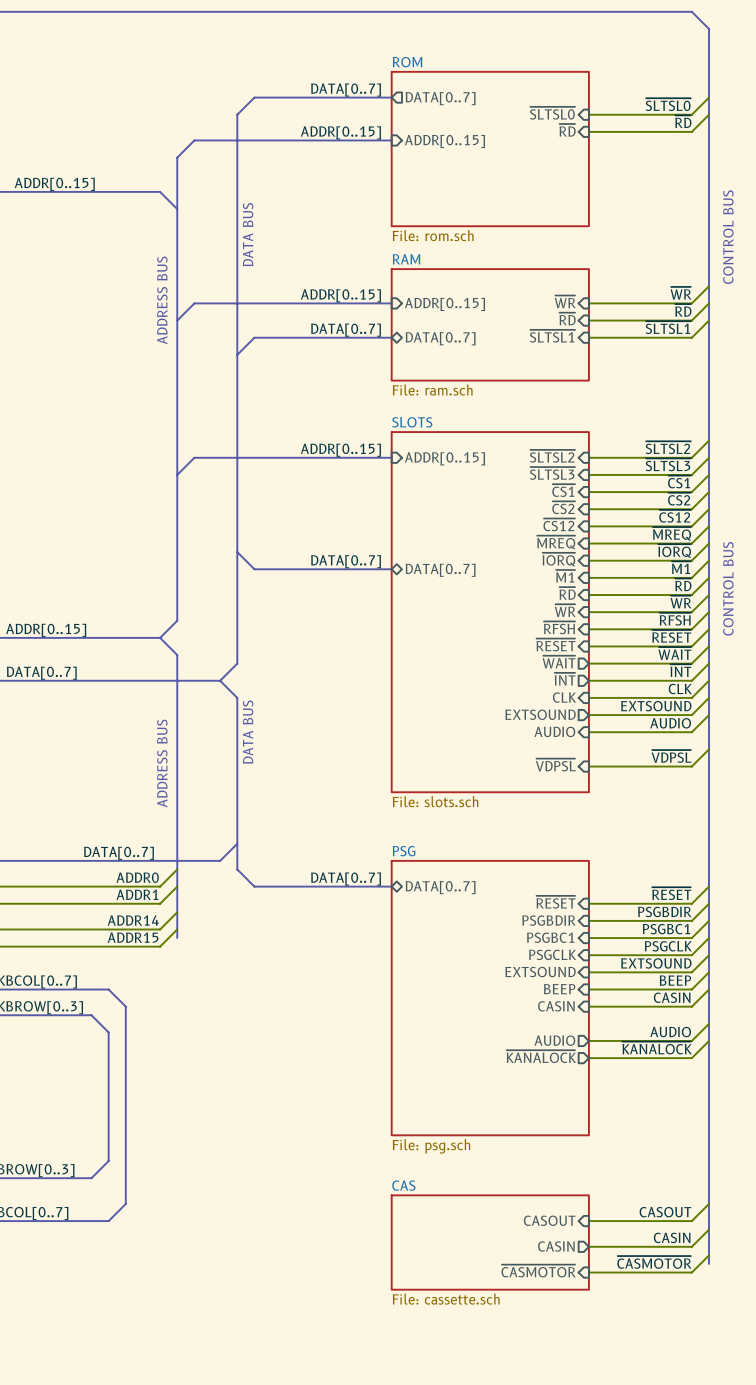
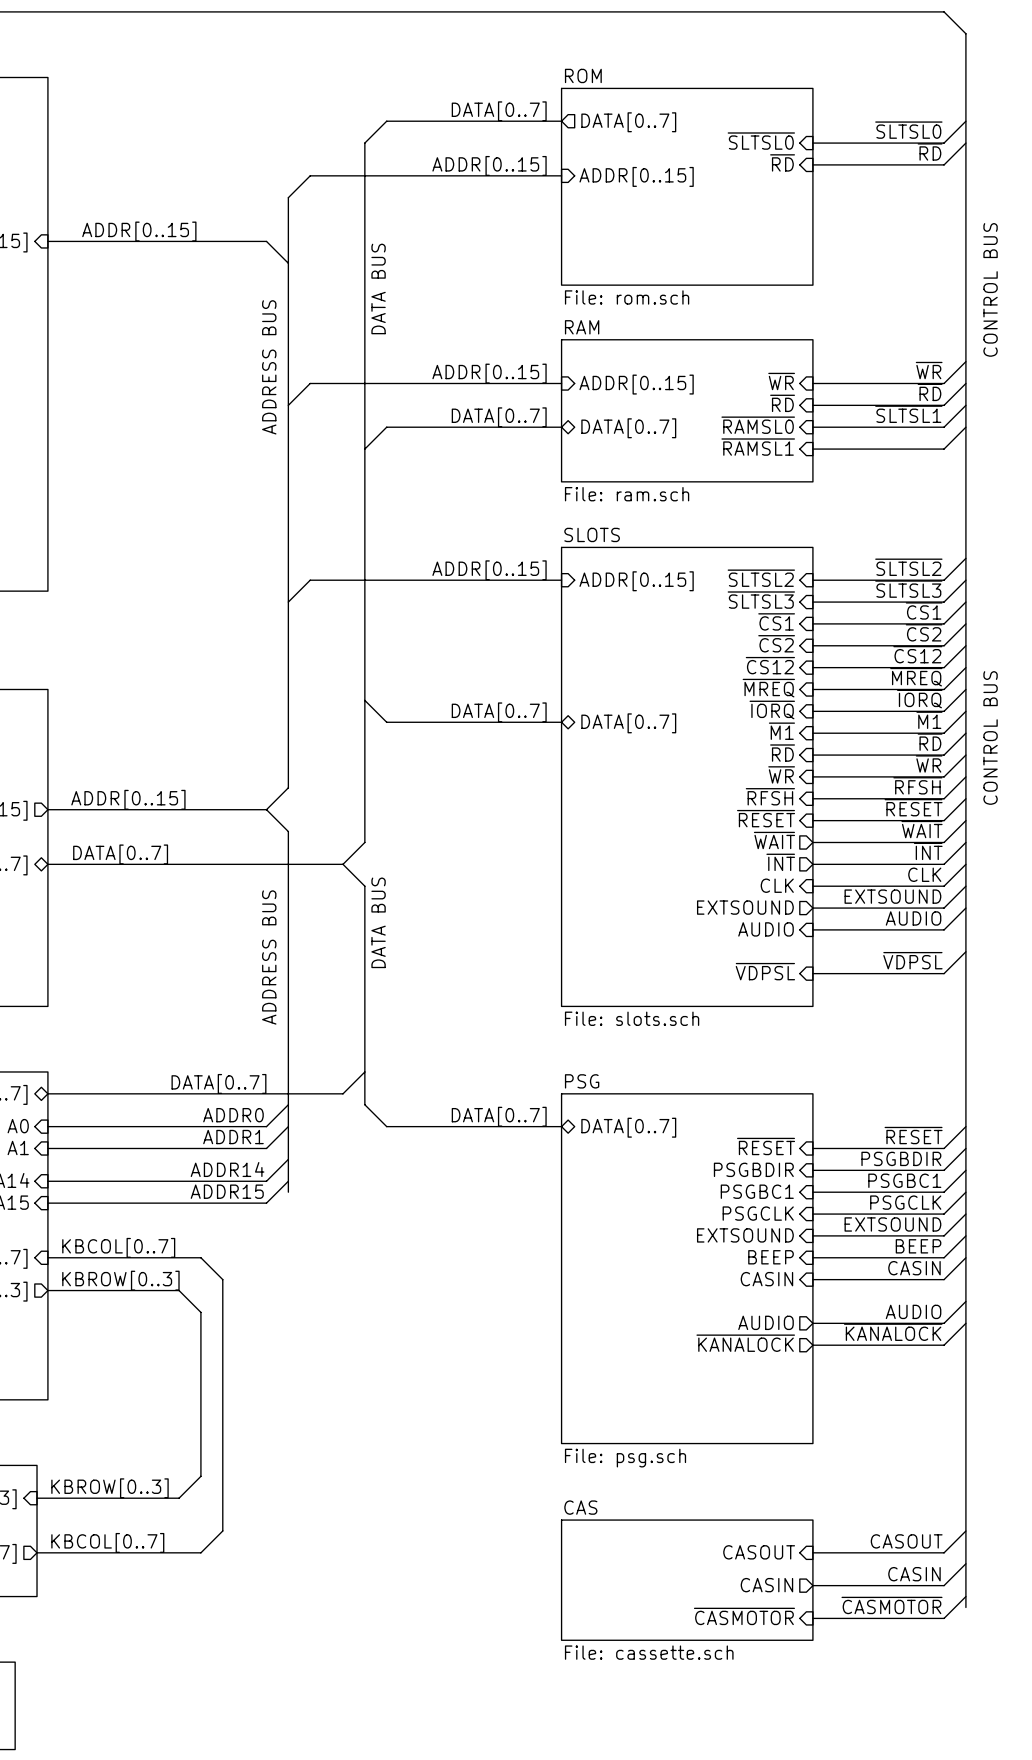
sheet pin: ~{SLTSL1} (552, 336) -> ~{RAMSL0} (758, 425)
wire: none -> (965, 427) (944, 449) (812, 449)
sheet pin: none -> ~{RAMSL1} (758, 447)

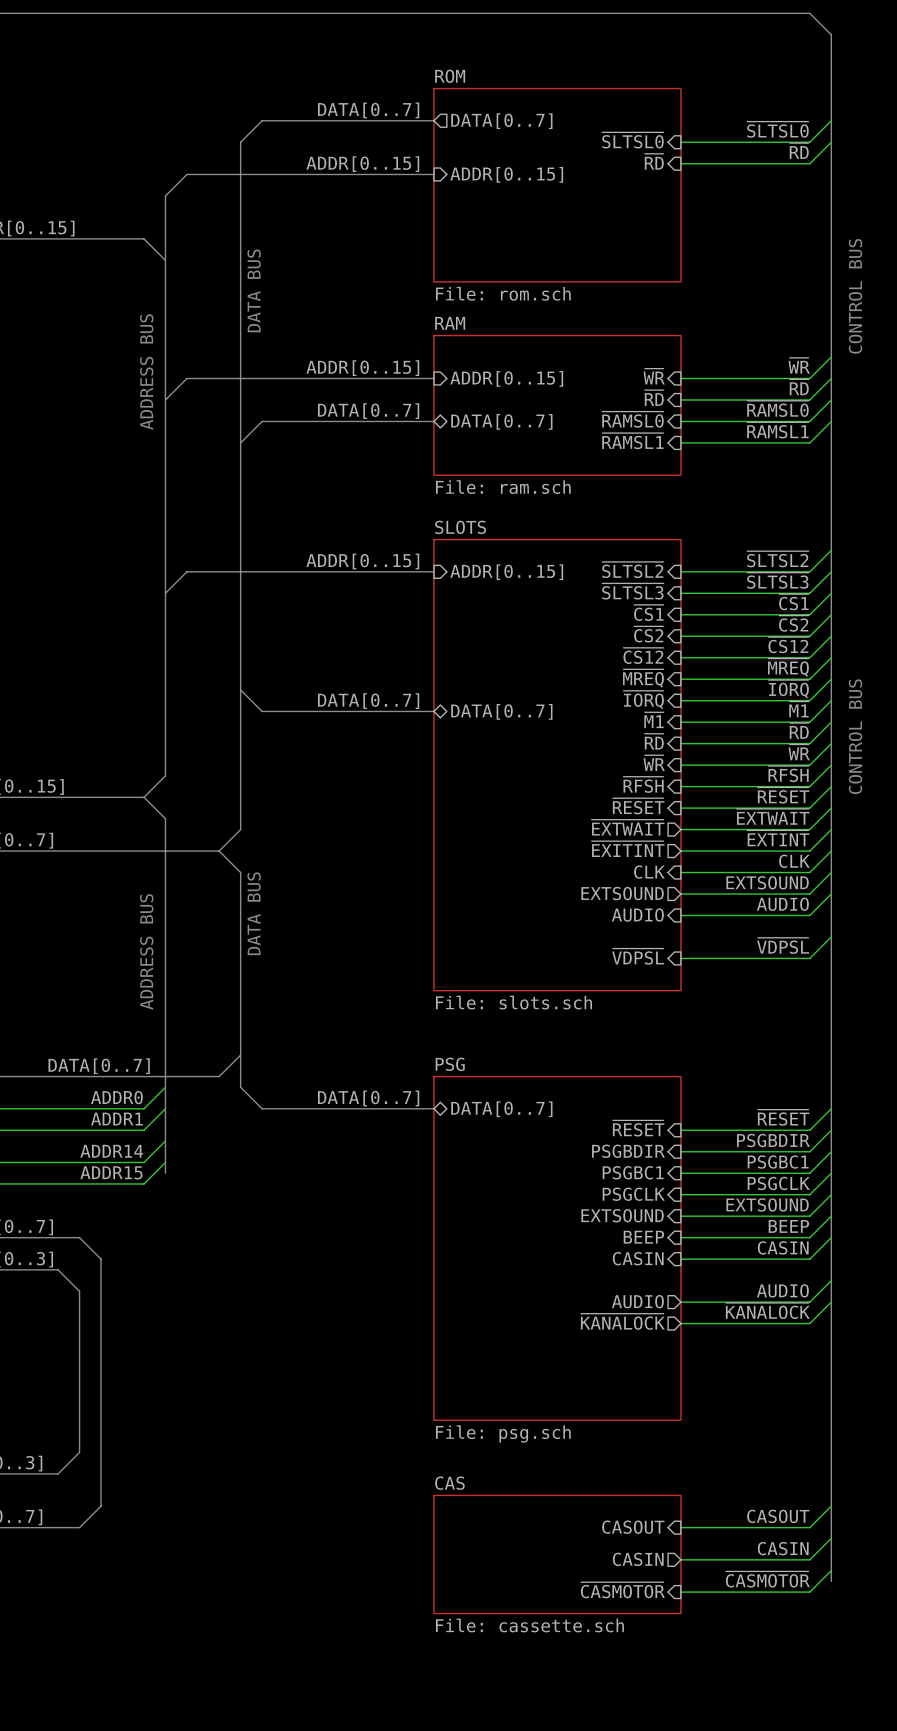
label: ~{SLTSL1} (908, 414) -> ~{RAMSL0} (777, 408)
label: none -> ~{RAMSL1} (777, 430)
label: ~{WAIT} (922, 829) -> ~{EXTWAIT} (773, 816)
sheet pin: ~{WAIT} (774, 840) -> ~{EXTWAIT} (628, 827)
label: ~{INT} (928, 851) -> ~{EXTINT} (778, 838)
sheet pin: ~{INT} (780, 862) -> ~{EXITINT} (628, 849)

